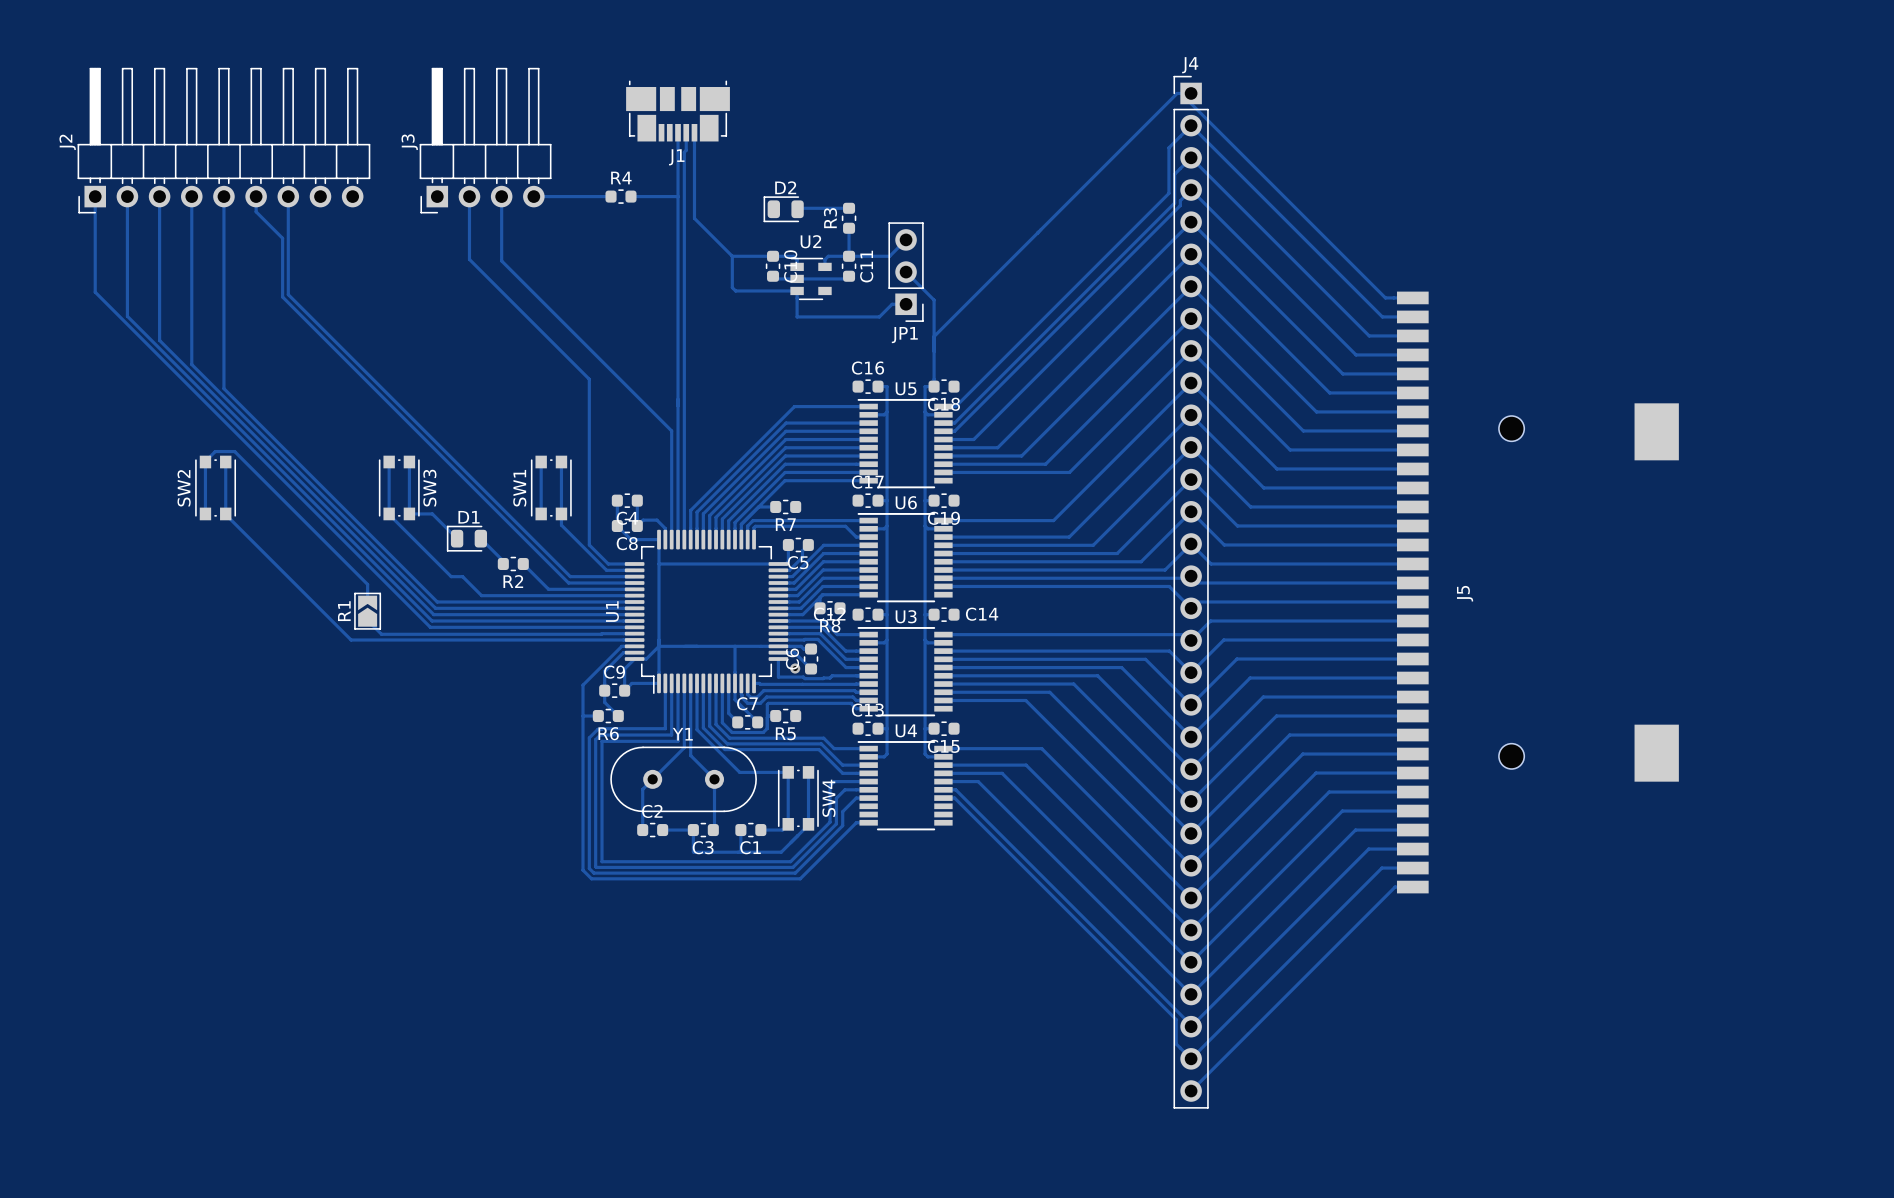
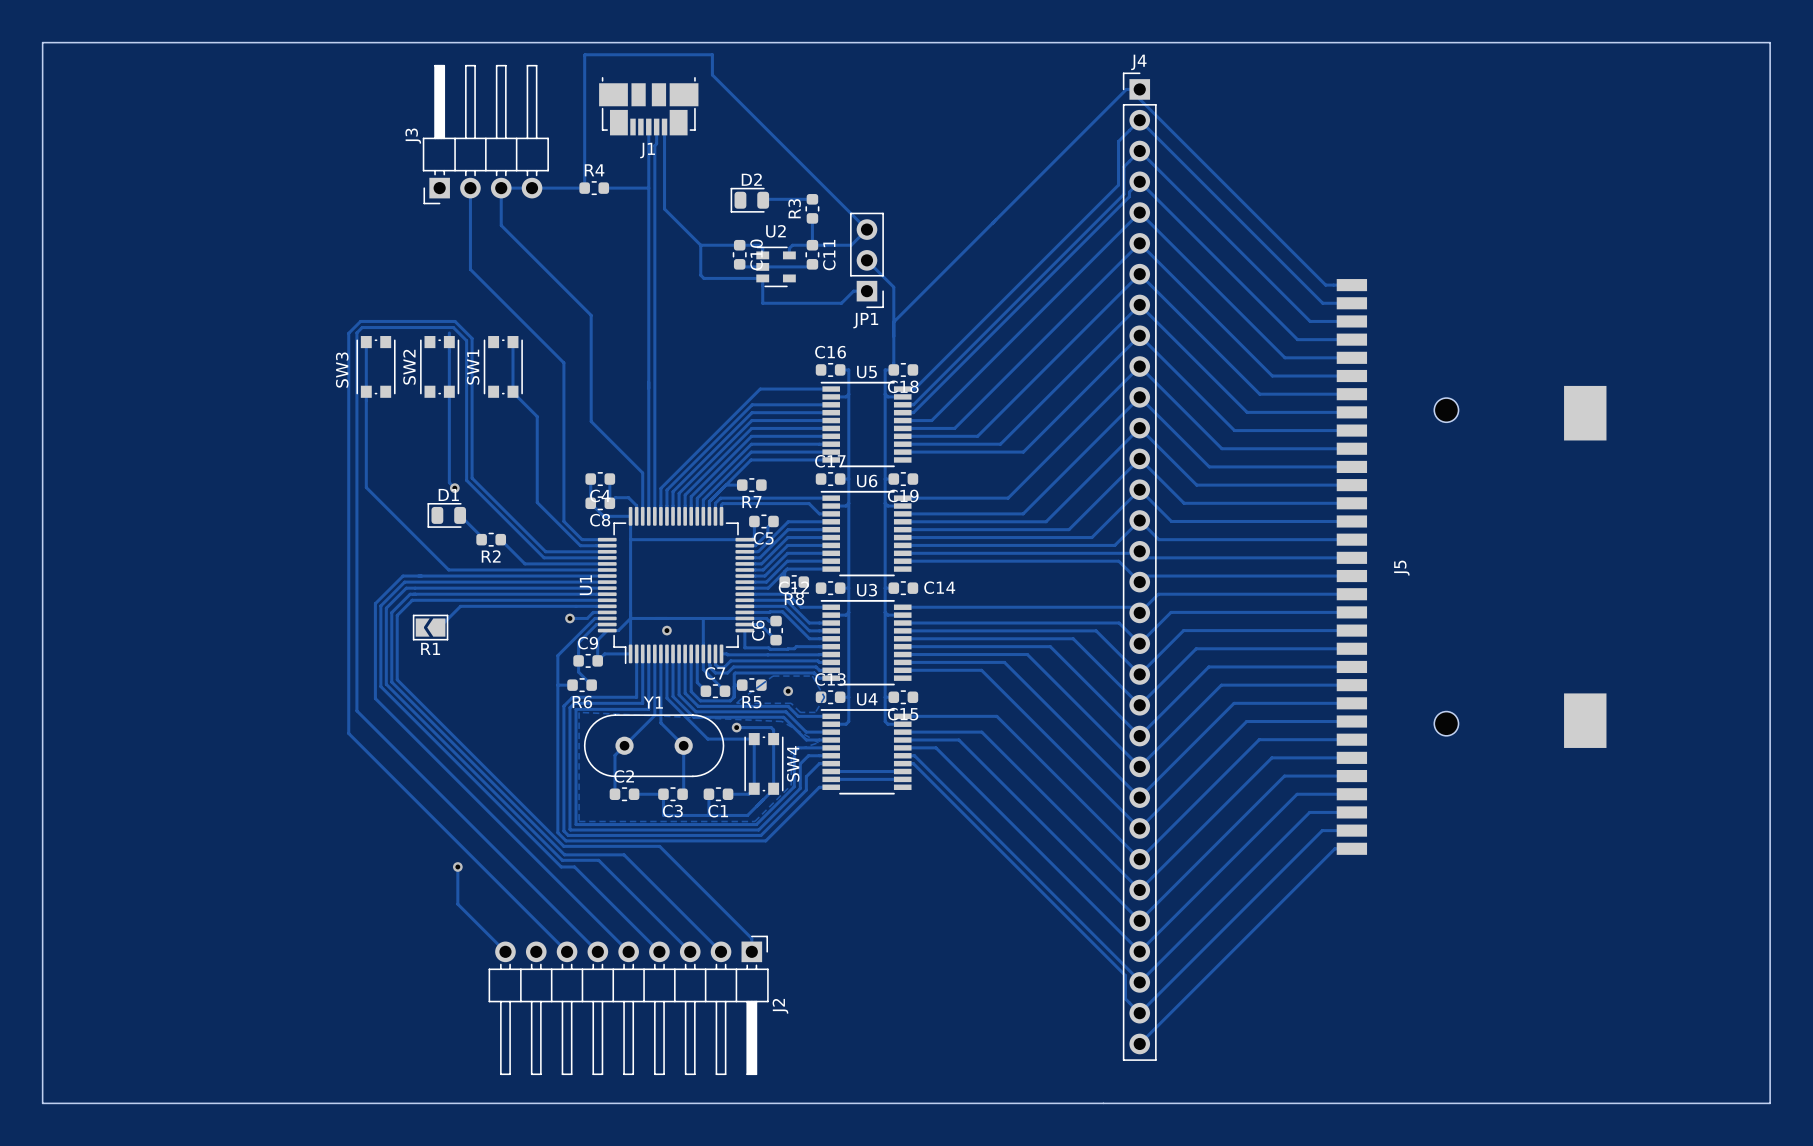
board edge: none -> (42, 42) (42, 1103) (1770, 1103) (1770, 42) (42, 42)
J2 rotation: 0° (223, 140) -> 180° (628, 1005)
J2 position: (223, 140) -> (628, 1005)
J3 position: (485, 140) -> (485, 134)
track: (95, 196) (95, 292) (430, 627) -> none
track: (127, 196) (127, 316) (432, 621) -> (721, 951) (624, 854) (564, 854) (391, 682) (391, 612) (410, 594) (413, 594)
track: (159, 196) (159, 340) (433, 614) -> (690, 951) (598, 860) (562, 860) (386, 684) (386, 608) (406, 588) (415, 588)
track: (191, 196) (191, 364) (435, 608) -> (659, 951) (574, 866) (561, 866) (380, 686) (380, 605) (404, 582) (416, 582)
track: (223, 196) (223, 388) (437, 602) -> (628, 951) (375, 698) (375, 603) (403, 576) (418, 576)
track: (256, 196) (256, 211) (282, 238) (282, 297) (487, 502) -> (597, 951) (356, 710) (356, 332) (362, 327) (453, 327) (466, 340) (466, 480)
track: (288, 196) (288, 294) (493, 499) -> (567, 951) (348, 733) (348, 333) (360, 321) (455, 321) (472, 338) (472, 478)
track: (469, 196) (469, 259) (491, 281) -> (470, 188) (470, 269)
track: (501, 196) (501, 260) (671, 430) (671, 494) -> (501, 188) (501, 225) (591, 315) (591, 421) (642, 472)
track: none -> (584, 188) (584, 55) (712, 54) (712, 75) (866, 229)
track: none -> (449, 332) (449, 482) (454, 488)
track: none -> (512, 342) (512, 392) (537, 416) (537, 442)
track: (225, 462) (225, 514) (351, 640) (620, 640) -> (569, 618) (587, 618) (593, 612)
track: (389, 462) (389, 514) (451, 576) (462, 576) (481, 595) -> (366, 342) (366, 487) (448, 569) (460, 569)
track: (409, 462) (409, 513) (432, 513) (457, 538) -> none
track: (541, 462) (541, 513) -> none
SW2 position: (215, 487) -> (439, 366)
SW3 position: (399, 487) -> (376, 366)
SW1 position: (551, 487) -> (503, 366)
SW3 name position: SW3 (429, 488) -> SW3 (342, 370)
via: none -> (454, 488)
track: (205, 513) (205, 461) (215, 451) (234, 451) (367, 584) (367, 602) -> none
R1 rotation: 0° (367, 611) -> 90° counterclockwise (430, 627)
R1 position: (367, 611) -> (430, 627)
track: (367, 620) (381, 634) (602, 633) -> (439, 627) (460, 606) (576, 606)
track: none -> (412, 600) (397, 615) (397, 679) (563, 846) (659, 846) (751, 938) (751, 951)
via: none -> (569, 618)
via: none -> (666, 630)
via: (795, 668) -> none
zone outline: none -> (773, 676) (736, 703) (791, 703) (800, 712) (815, 712) (824, 697) (812, 676) (773, 676)
via: none -> (788, 691)
zone outline: none -> (579, 712) (579, 821) (754, 821) (791, 785) (791, 751) (818, 742) (782, 721) (579, 712)
track: none -> (736, 727) (771, 727) (773, 729) (773, 739)
via: none -> (736, 727)
track: none -> (831, 771) (902, 771)
track: none -> (831, 779) (902, 779)
track: none -> (457, 866) (457, 904) (505, 951)
via: none -> (457, 866)

